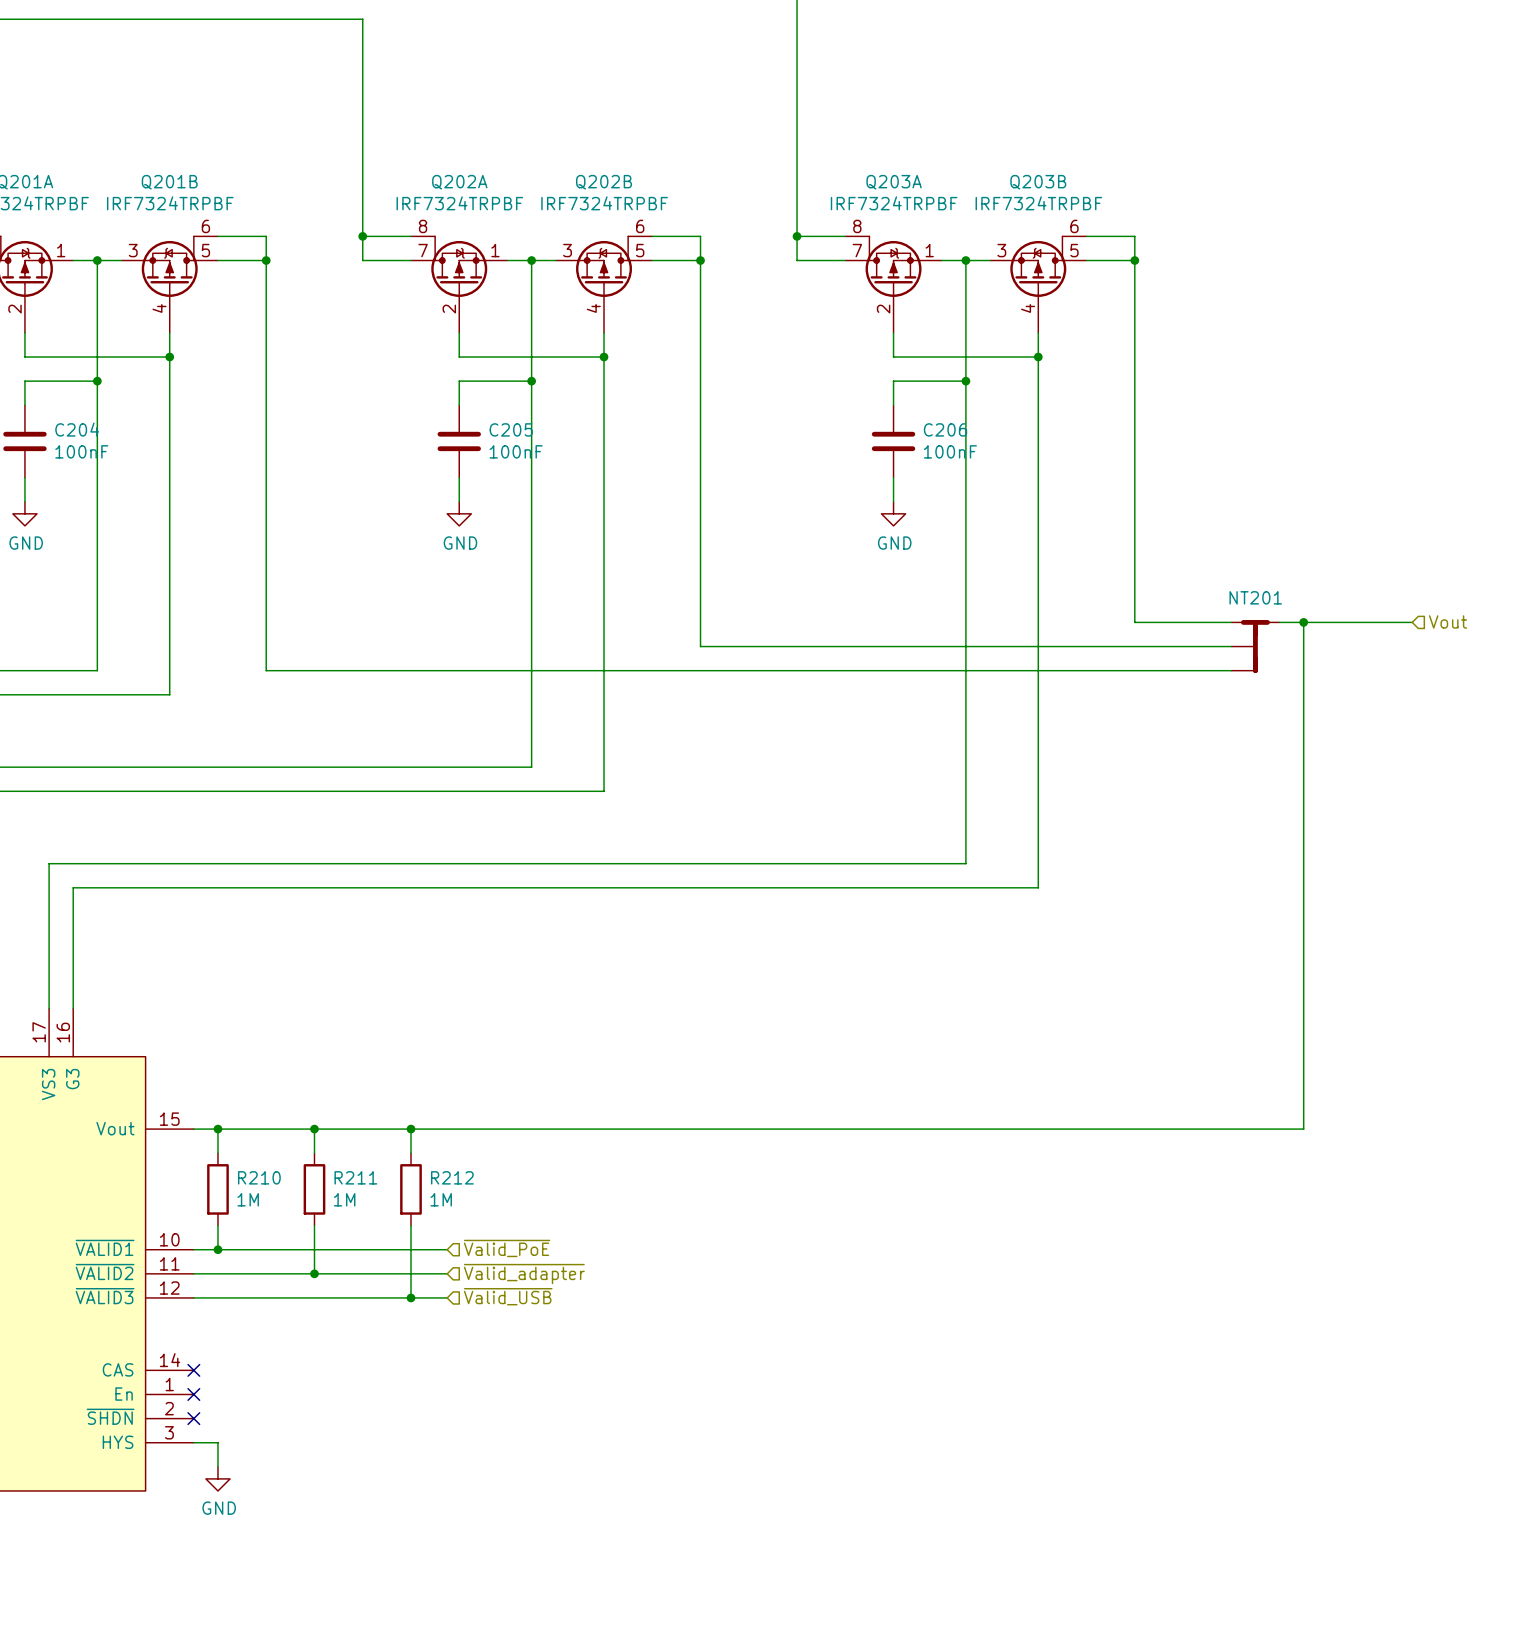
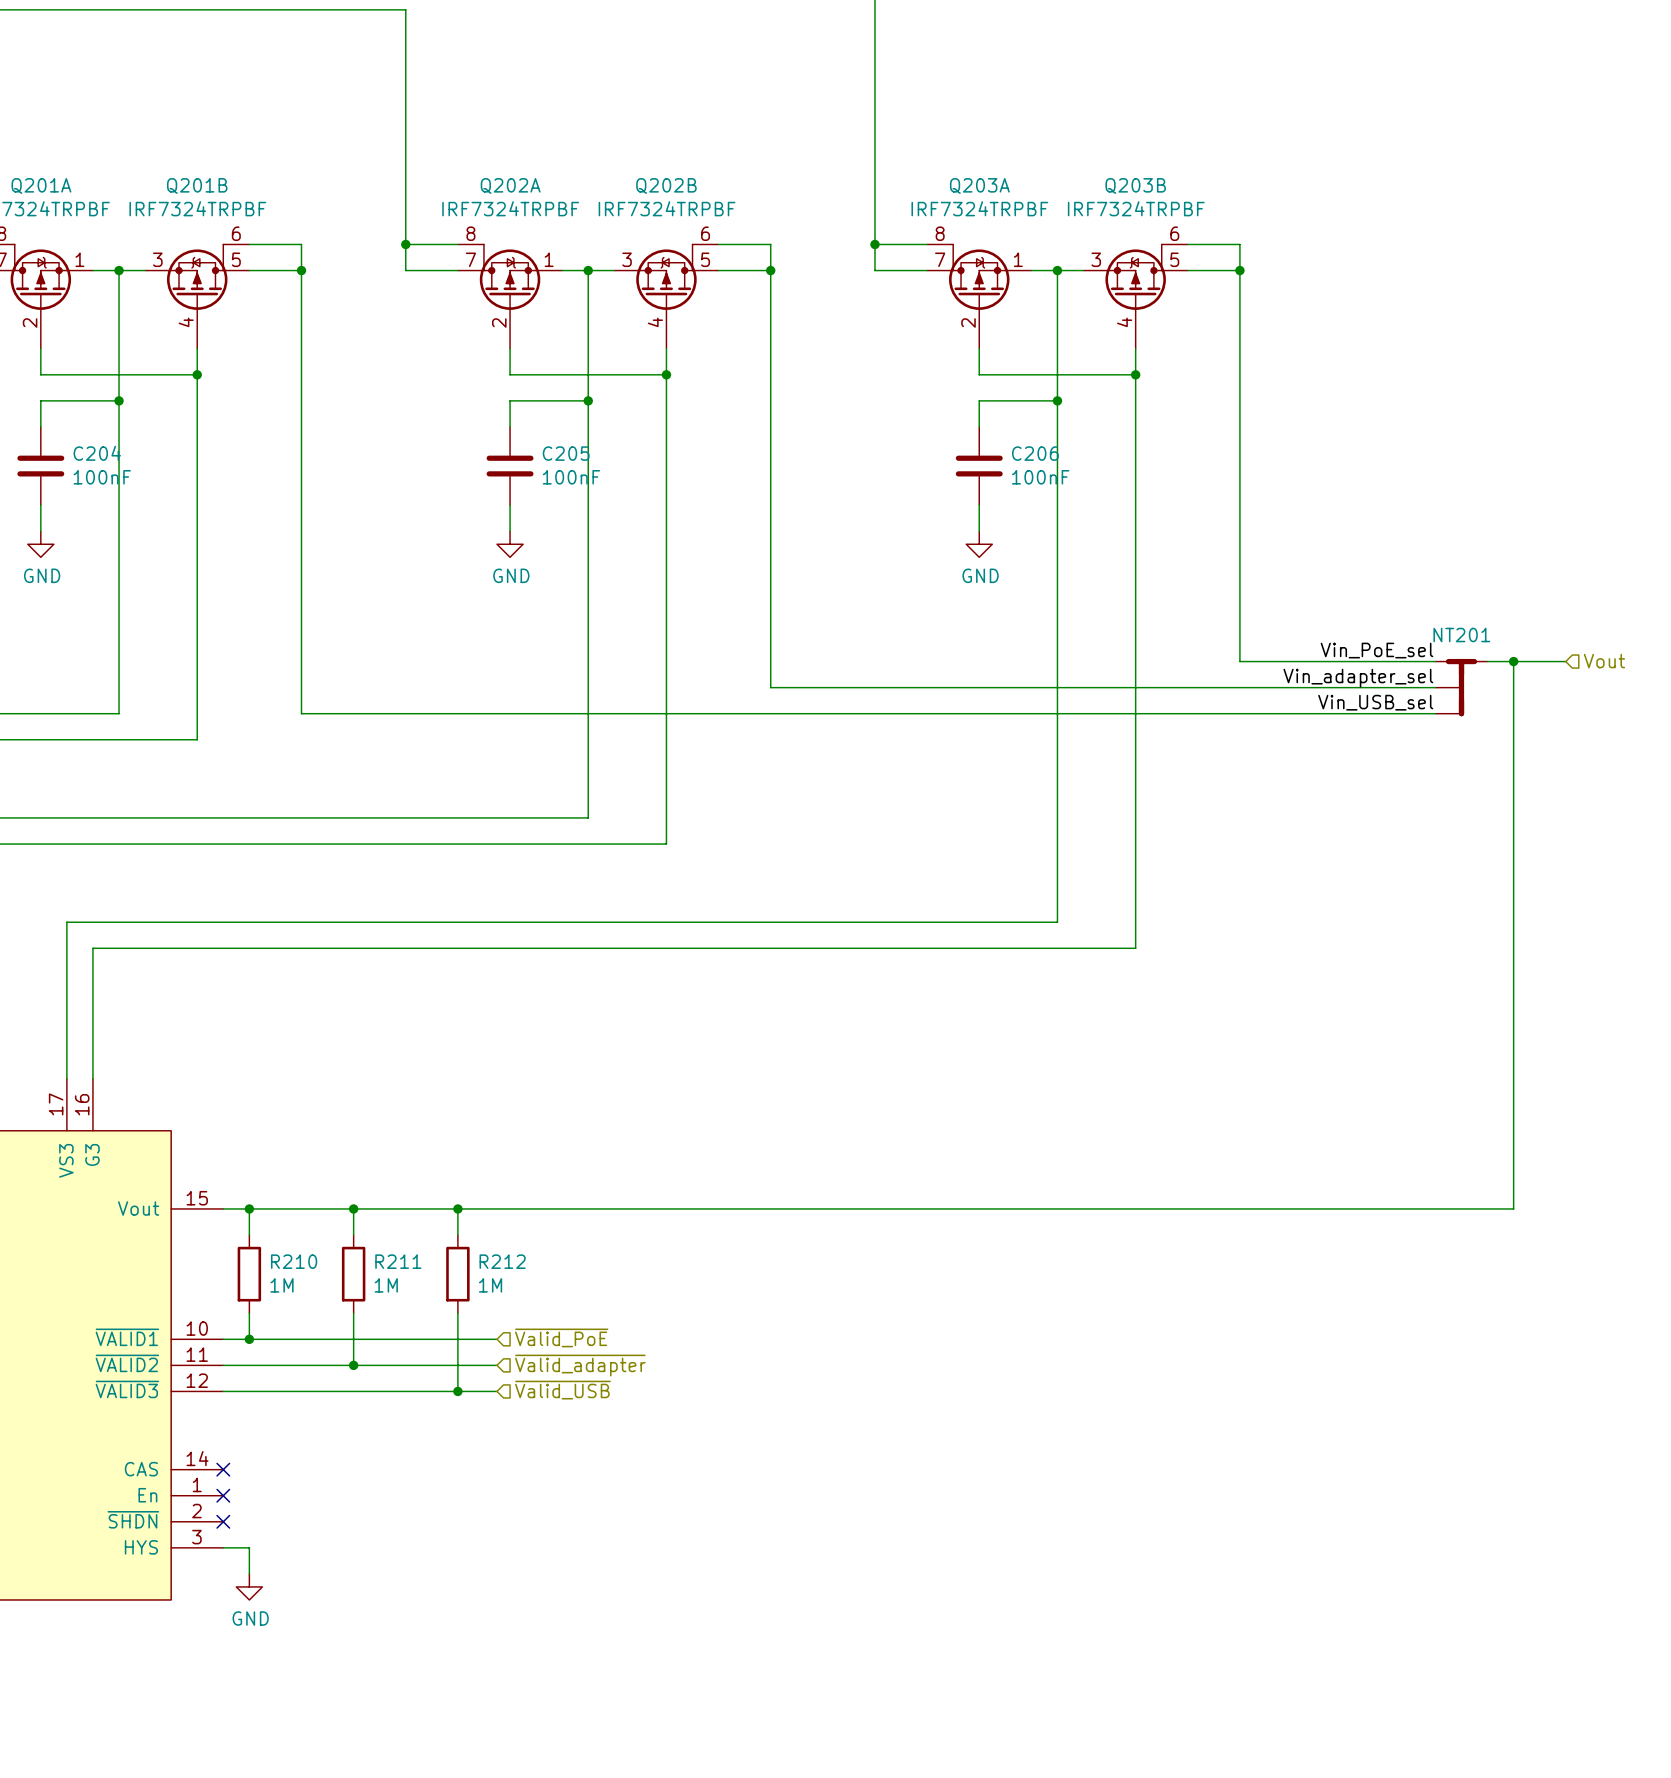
label: none -> Vin_PoE_sel (1377, 650)
hierarchical label position: Vout (1448, 621) -> Vout (1604, 661)
wire: (1303, 622) (1303, 1129) -> (1513, 661) (1513, 1208) (1422, 1208)
junction: (1303, 622) -> none
junction: none -> (1513, 661)
wire: none -> (1539, 661) (1565, 661)
label: none -> Vin_adapter_sel (1358, 678)
wire: none -> (1344, 687) (1435, 687)
NT201 position: (1255, 646) -> (1461, 687)
label: none -> Vin_USB_sel (1375, 702)
wire: none -> (1344, 713) (1435, 713)

